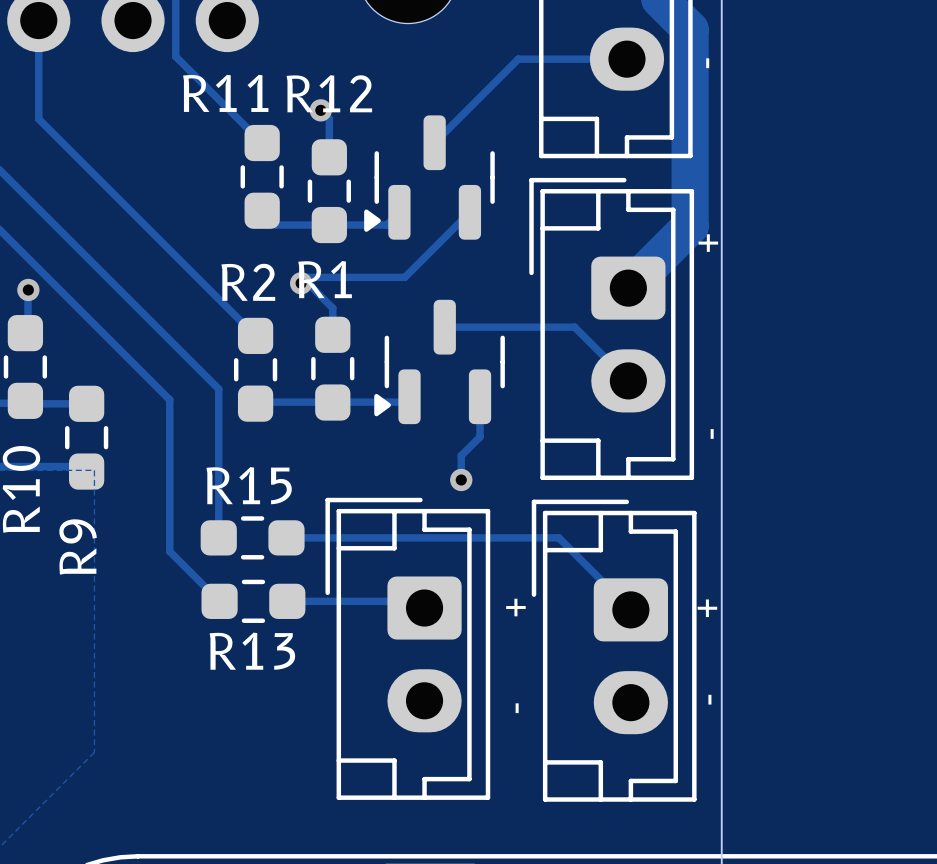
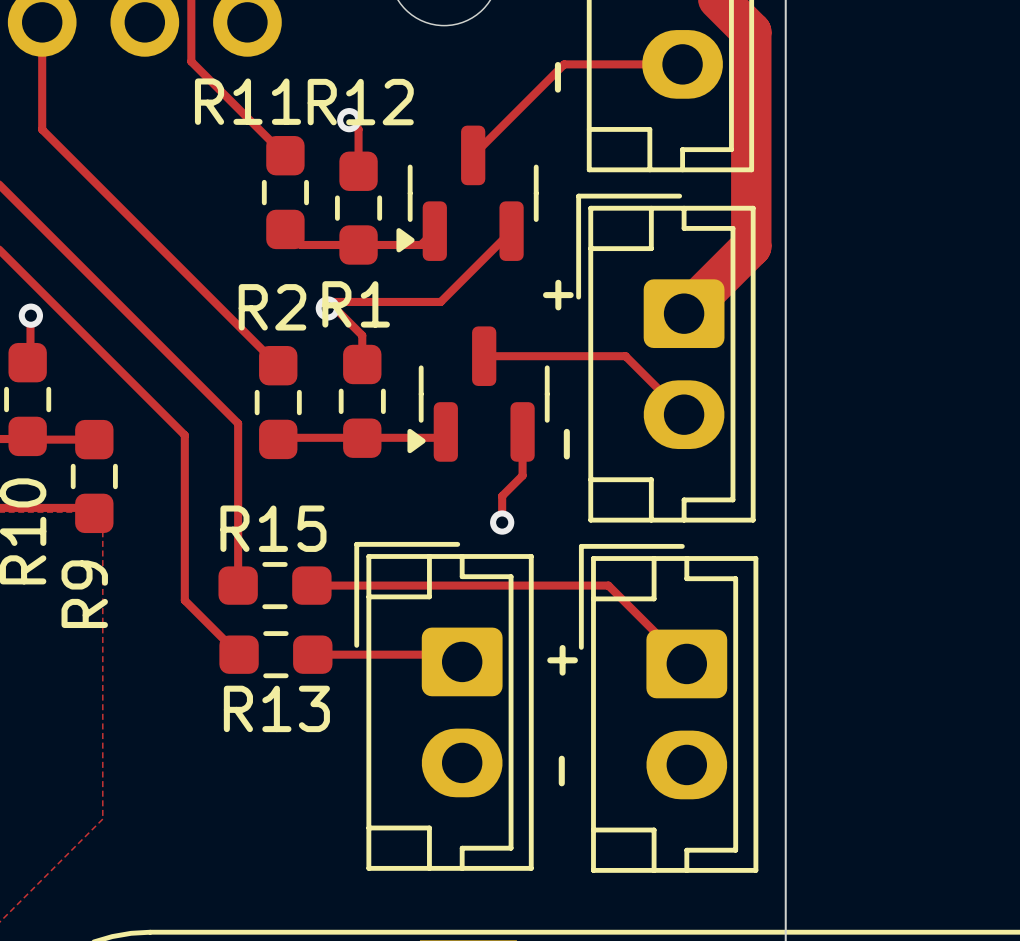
text position: - (707, 63) -> - (557, 77)
text: + (708, 243) -> none
text: none -> + (558, 295)
text: none -> - (566, 444)
text: - (712, 433) -> none
text: + (707, 608) -> none
text: - (709, 699) -> none

